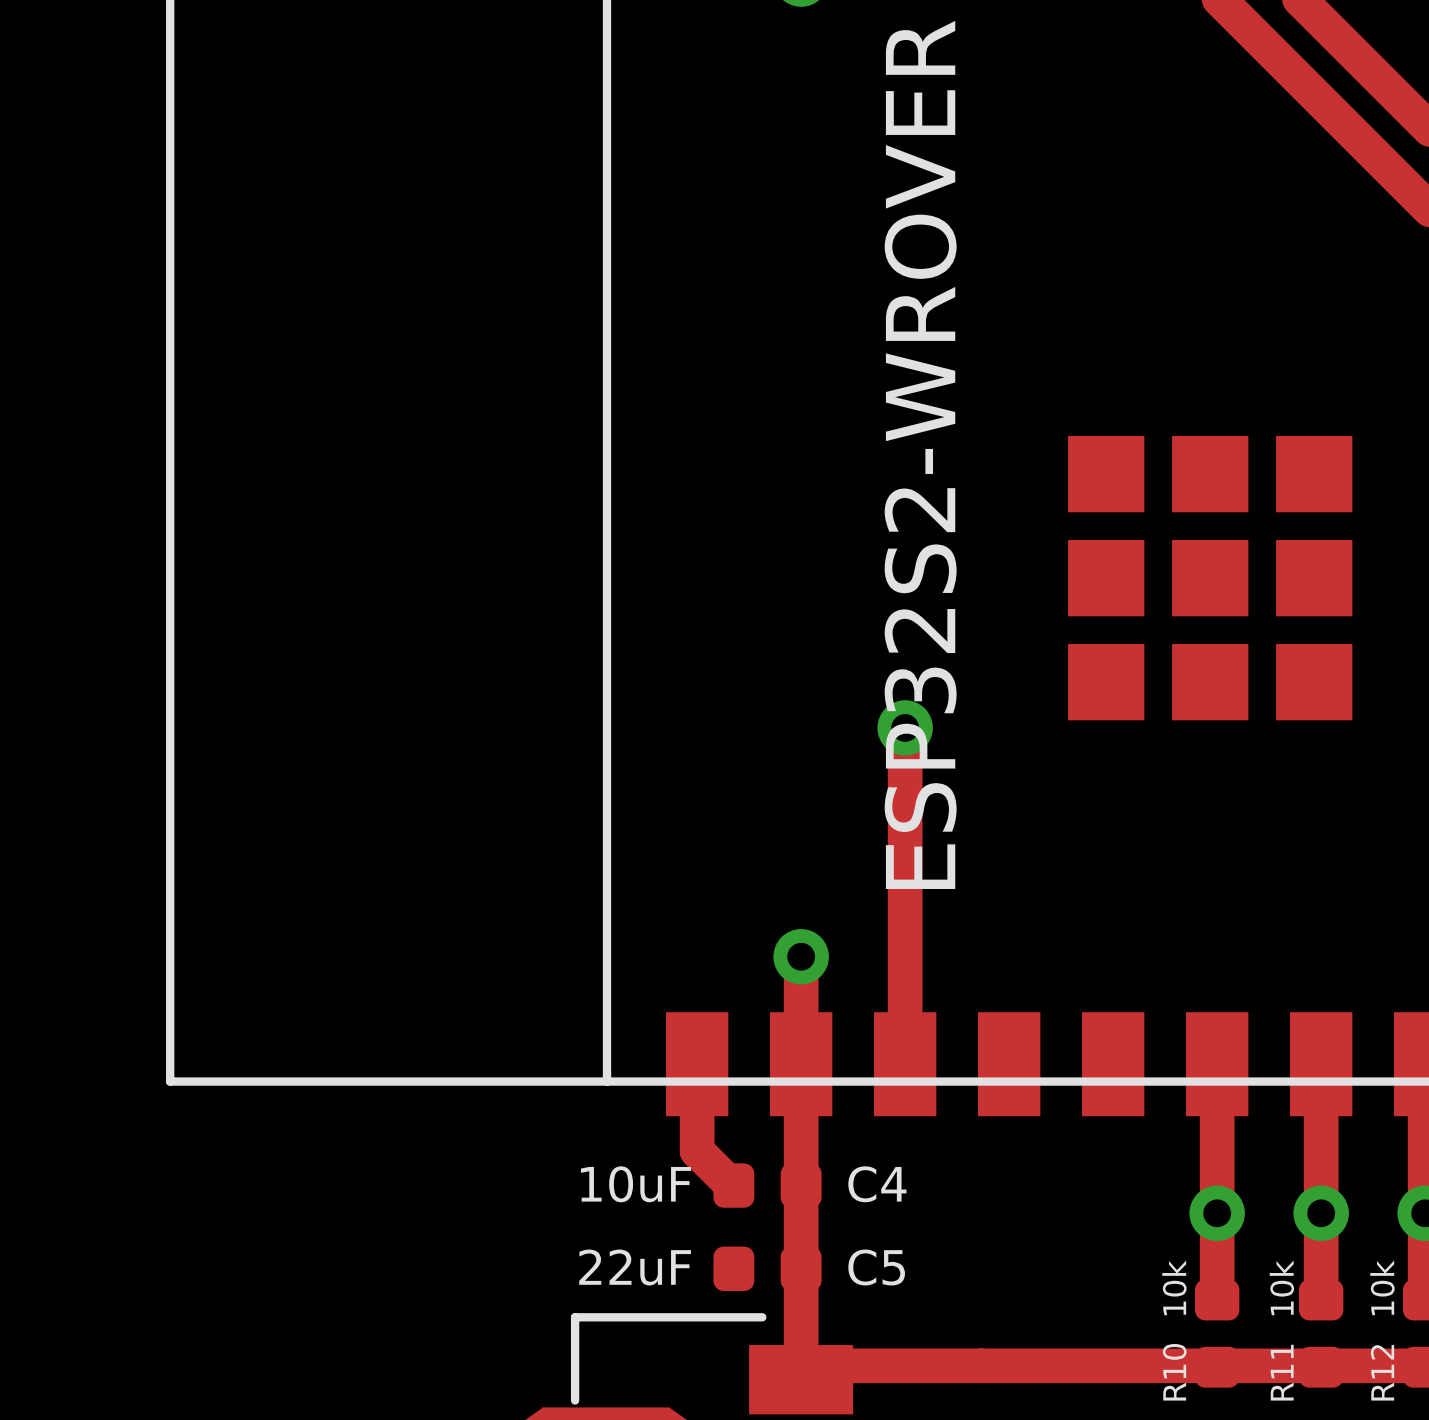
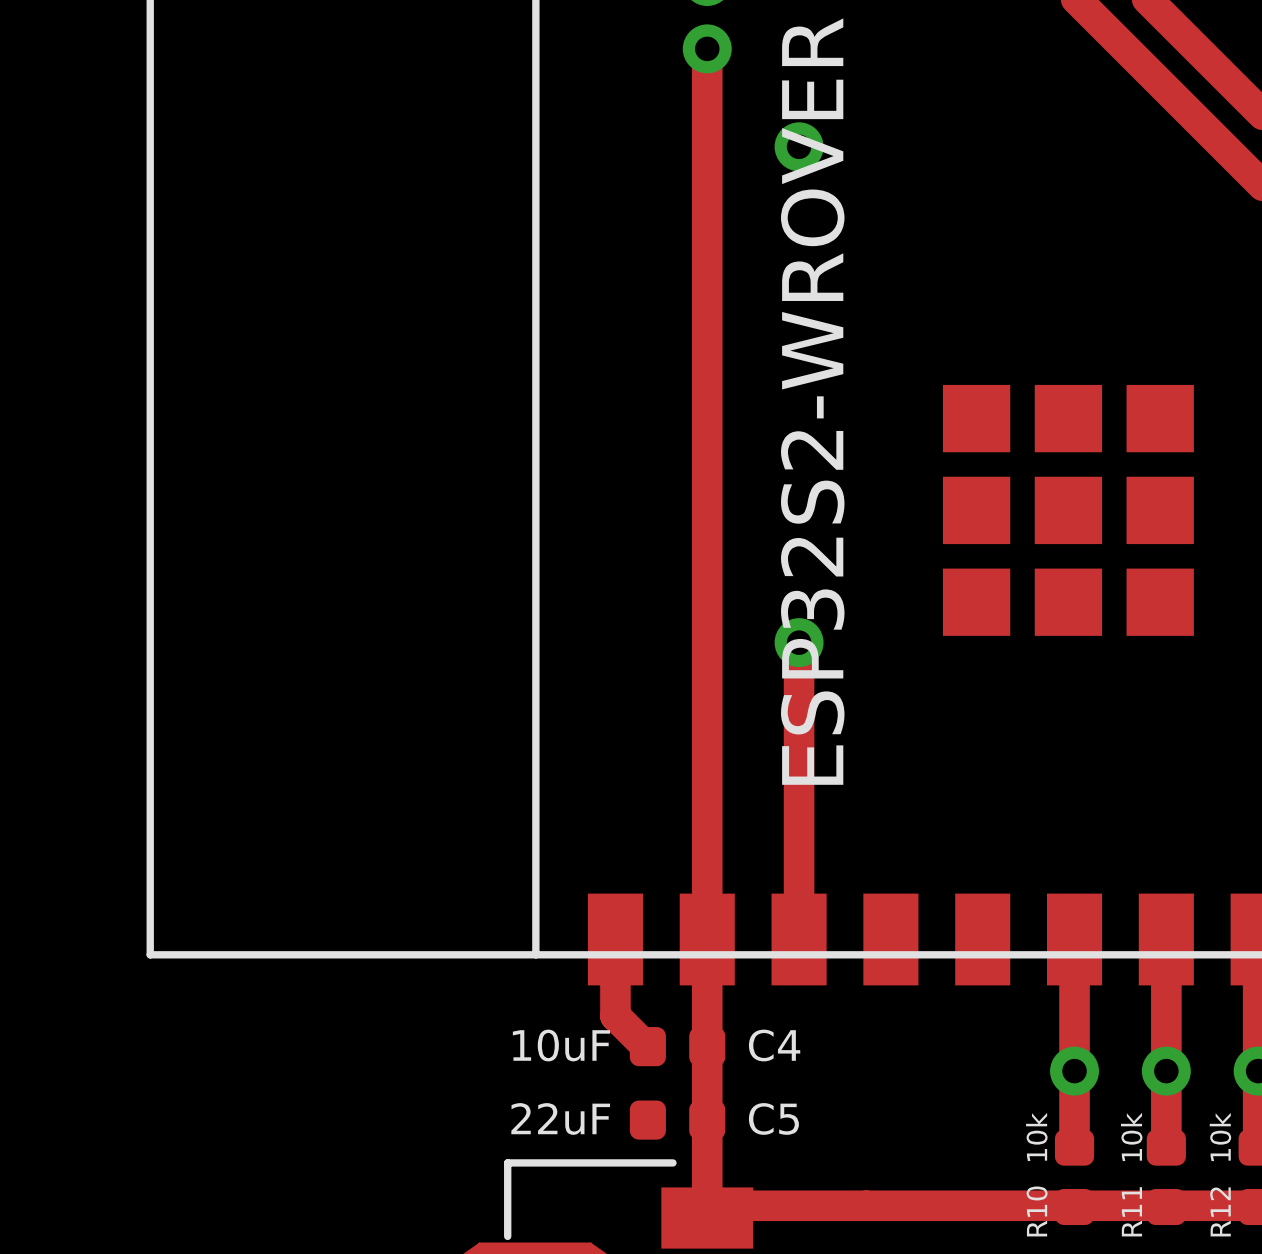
track: none -> (707, 48) (707, 844)
via: none -> (707, 48)
via: none -> (799, 146)
via: (801, 956) -> none

